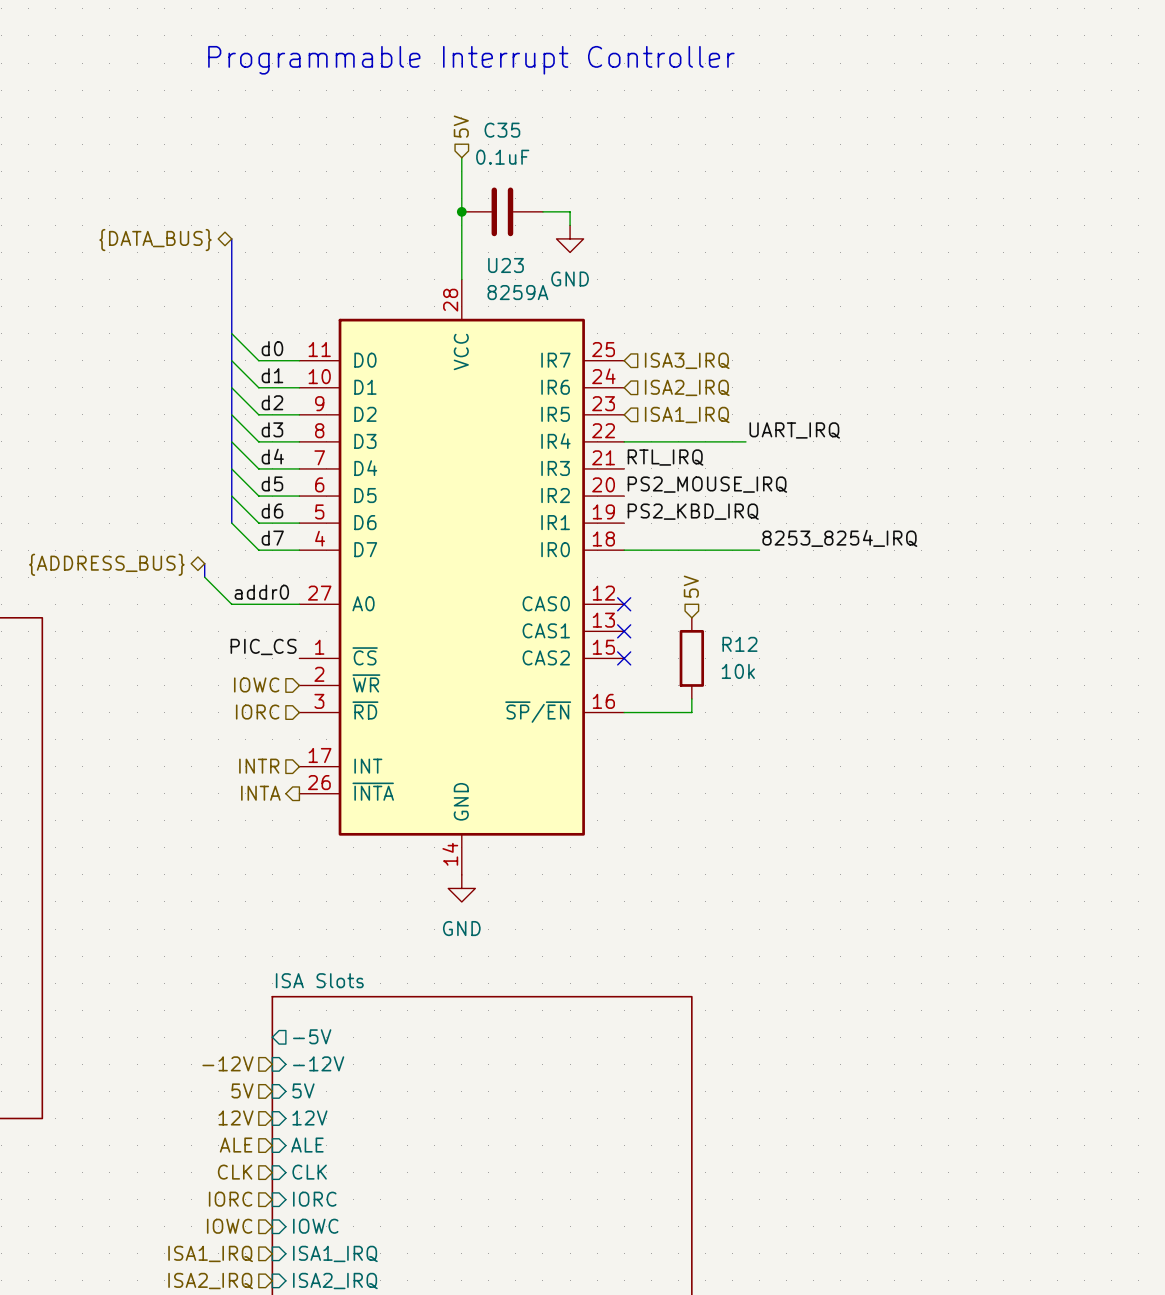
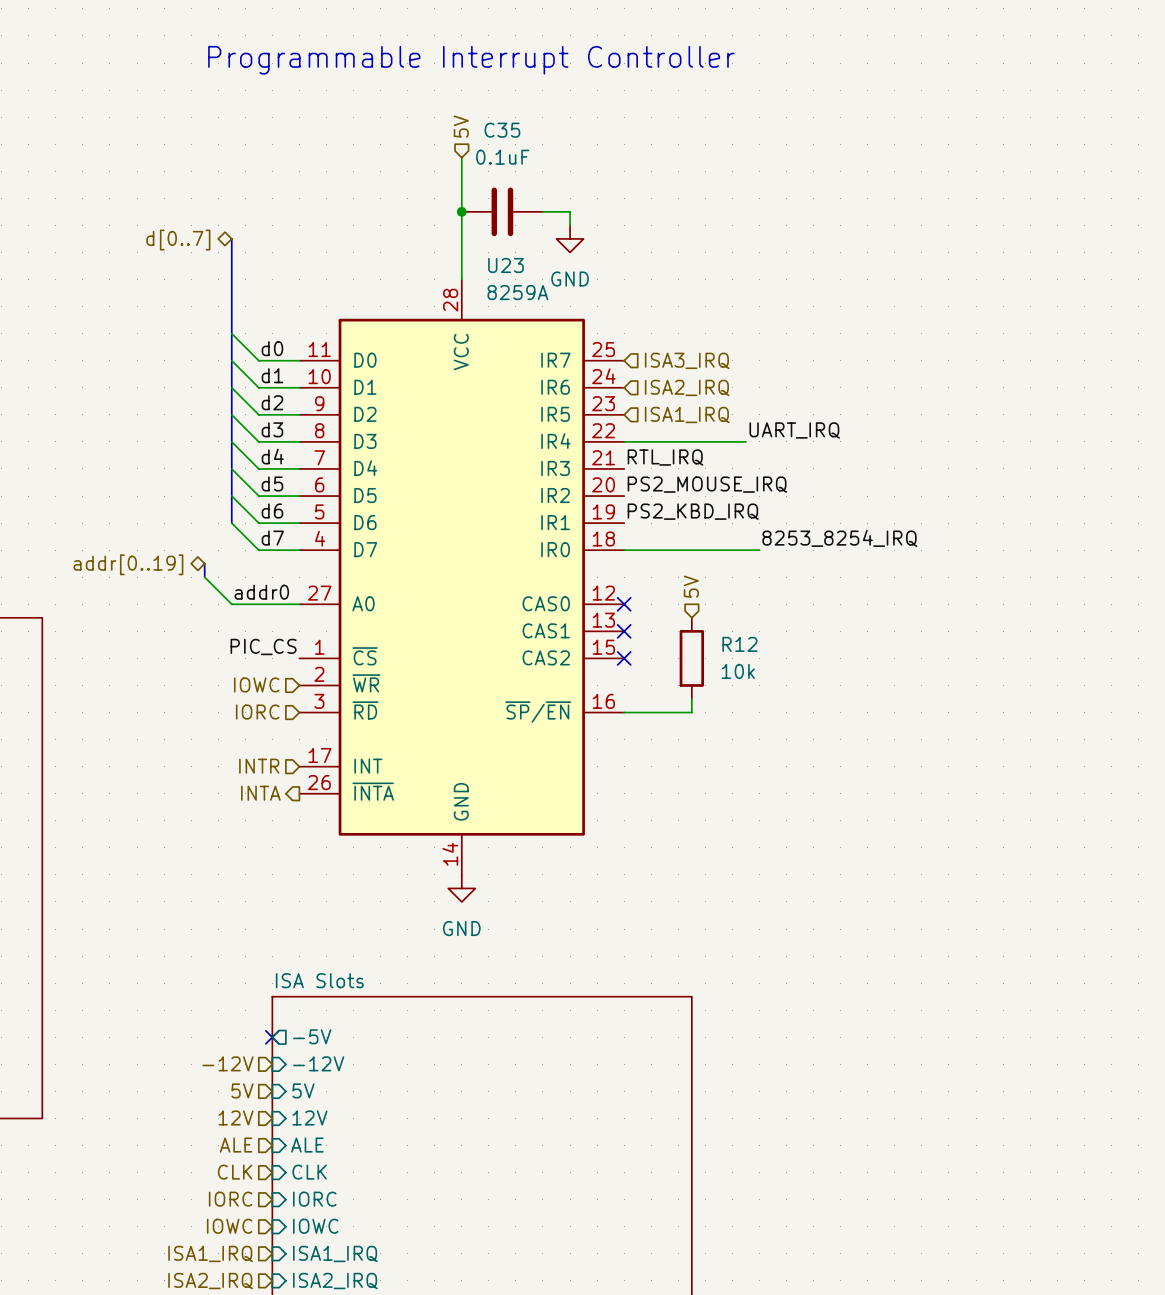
hierarchical label: {DATA_BUS} (155, 240) -> d[0..7] (178, 240)
hierarchical label: {ADDRESS_BUS} (106, 564) -> addr[0..19] (128, 564)
no-connect mark: none -> (272, 1037)

